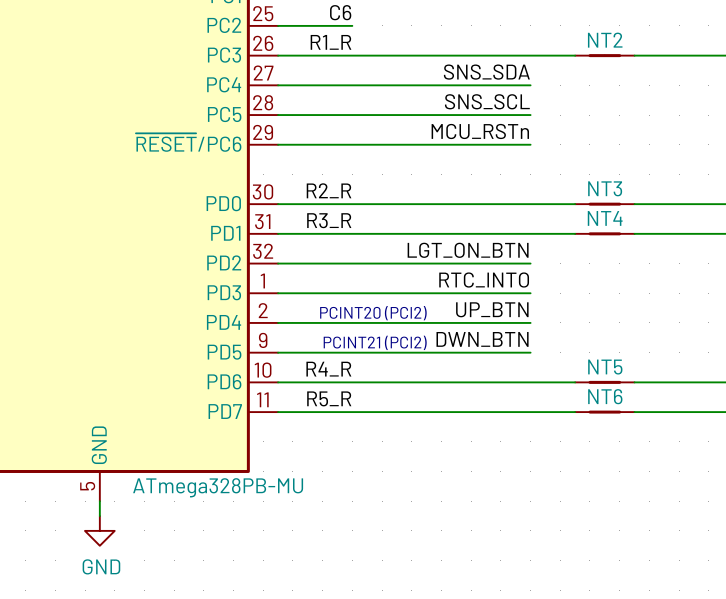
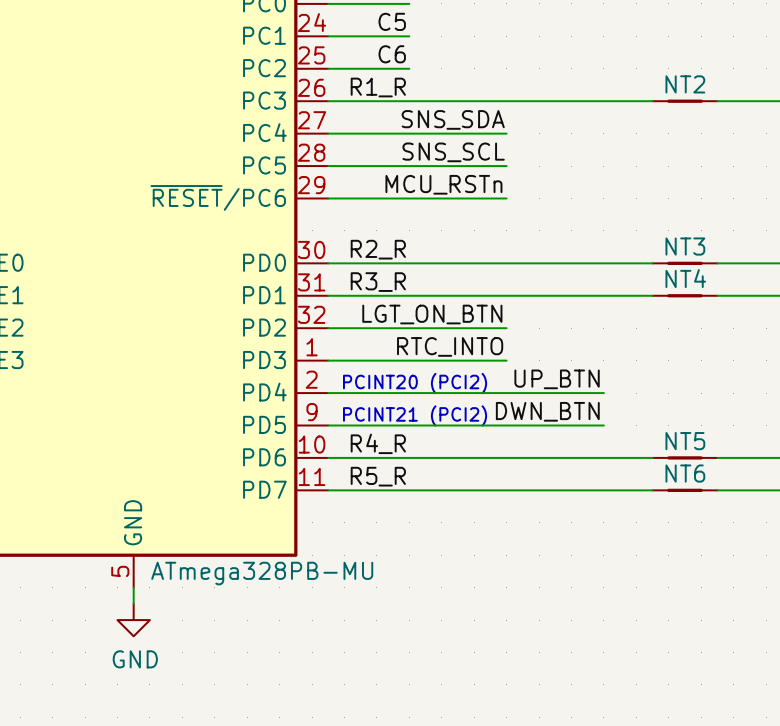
label position: SNS_SDA (486, 72) -> SNS_SDA (453, 119)
wire: (441, 85) (530, 85) -> none
label position: SNS_SCL (487, 101) -> SNS_SCL (453, 152)
wire: (441, 115) (530, 115) -> none
label position: MCU_RSTn (480, 131) -> MCU_RSTn (443, 184)
wire: (441, 144) (530, 144) -> none
label position: LGT_ON_BTN (468, 250) -> LGT_ON_BTN (432, 314)
wire: (441, 263) (530, 263) -> none
label position: RTC_INTO (484, 280) -> RTC_INTO (450, 346)
wire: (441, 293) (530, 293) -> none

